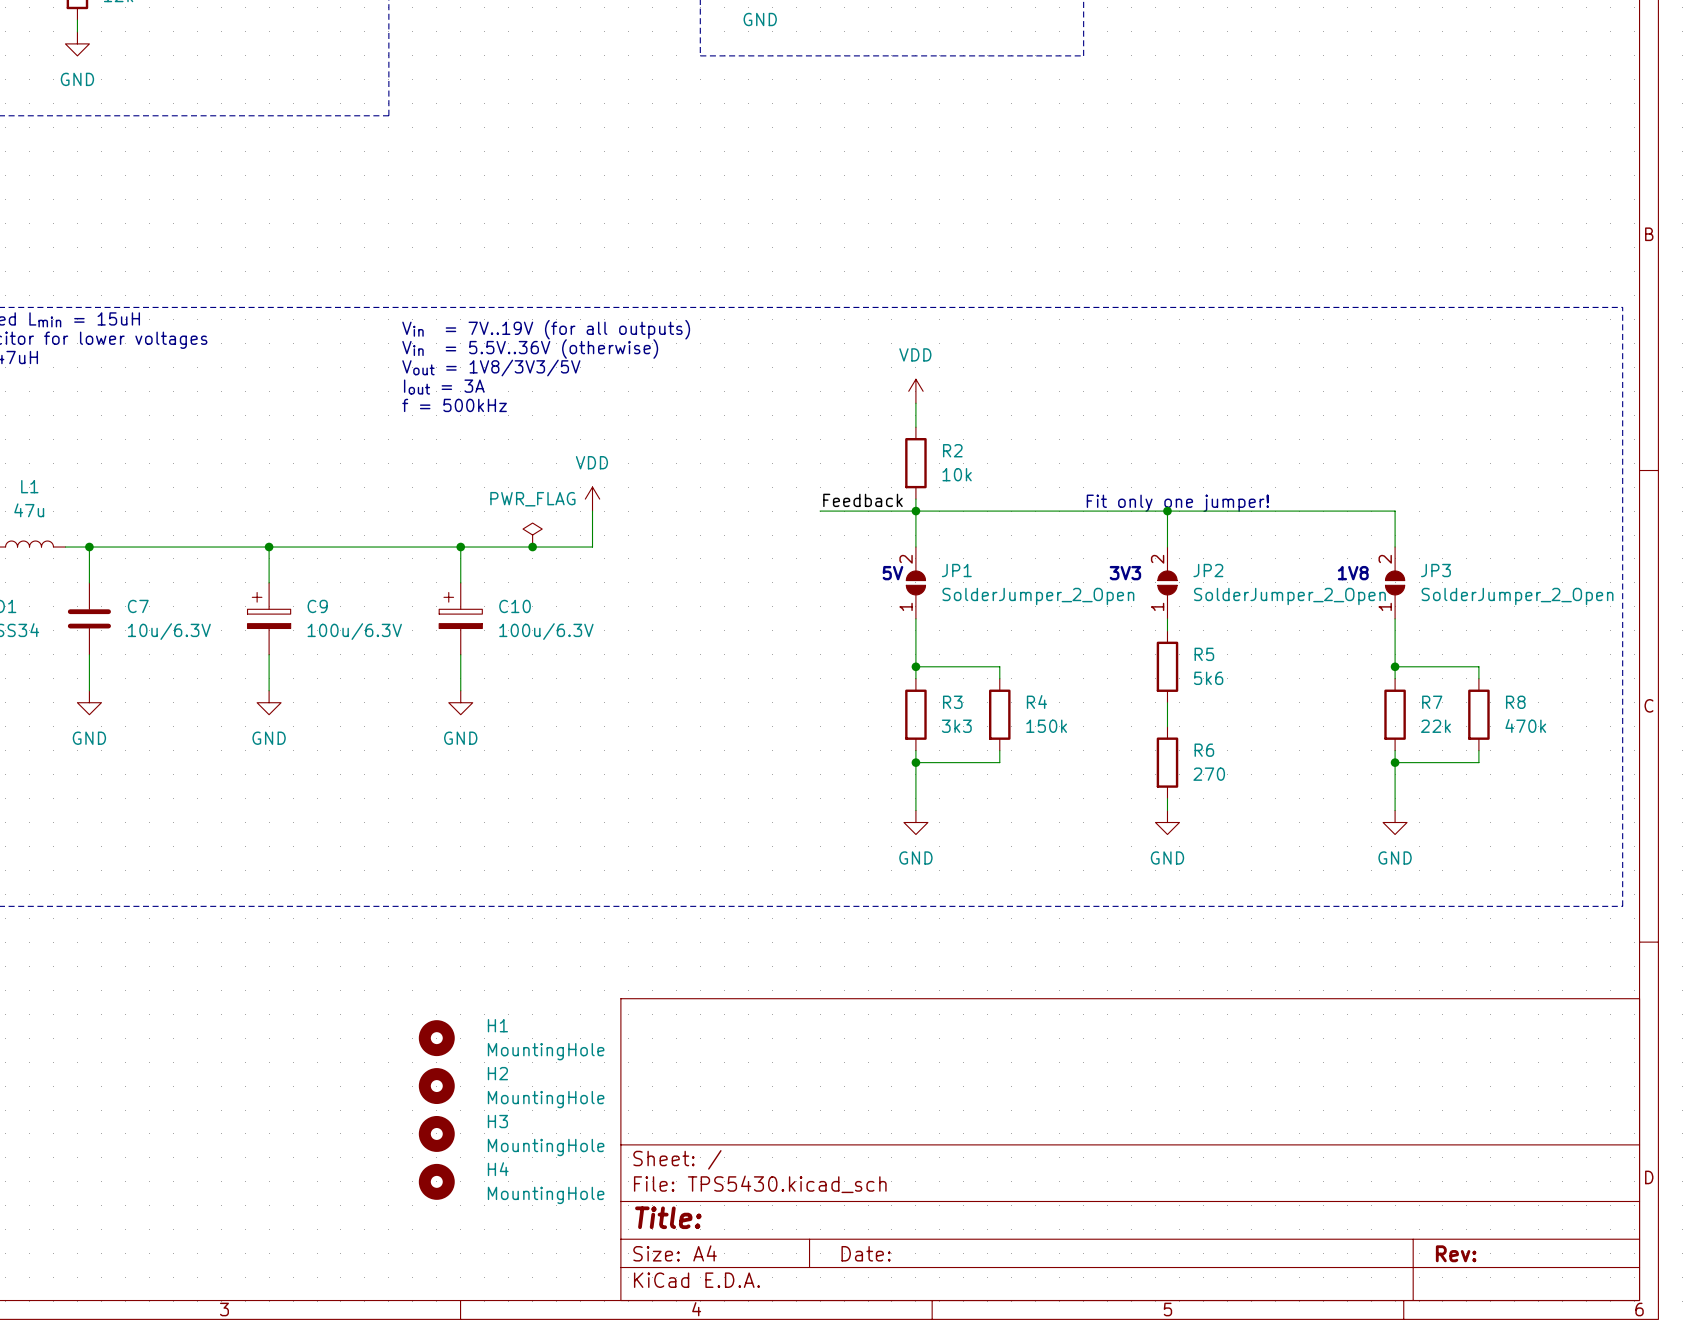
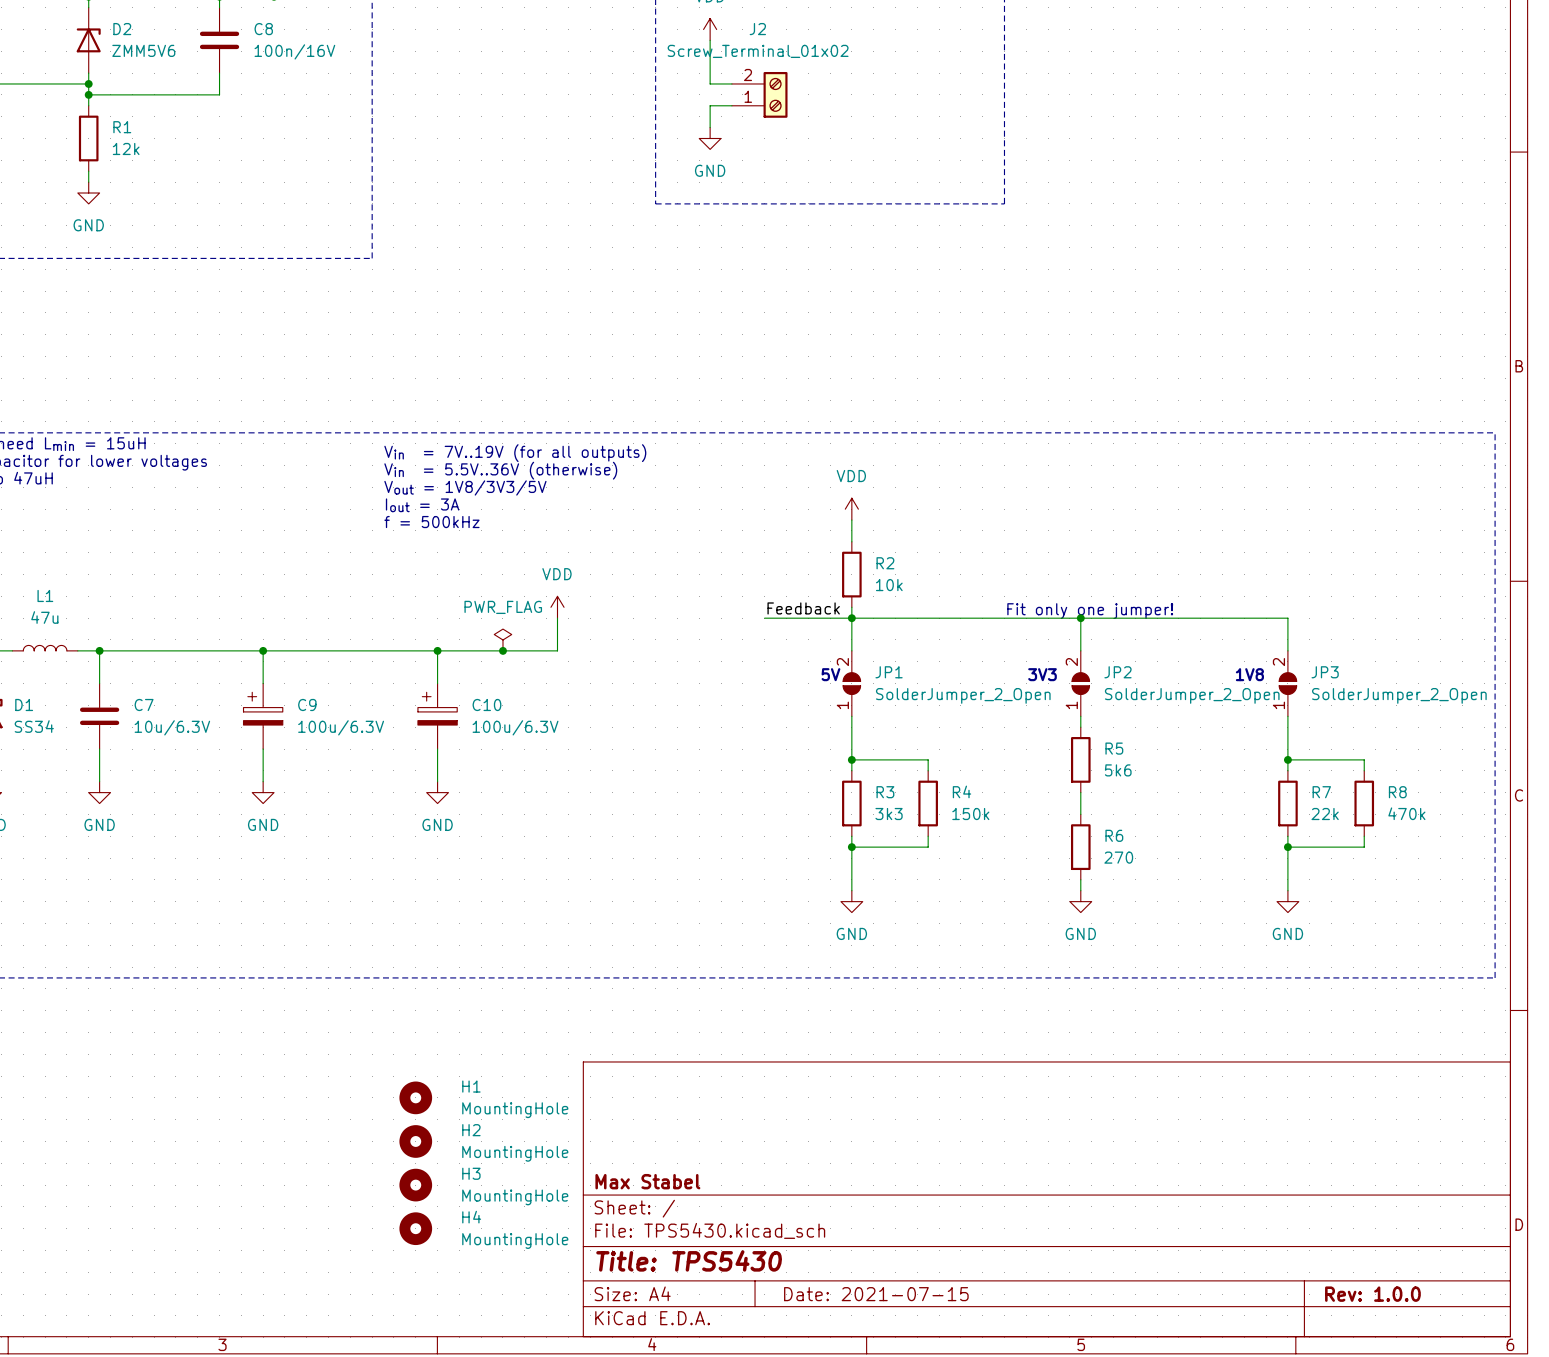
title block: none -> Max Stabel (647, 1181)
title block: Title: (668, 1217) -> Title: TPS5430 (689, 1260)
title block: Date: (866, 1253) -> Date: 2021-07-15 (876, 1294)
title block: Rev: (1456, 1253) -> Rev: 1.0.0 (1372, 1294)

